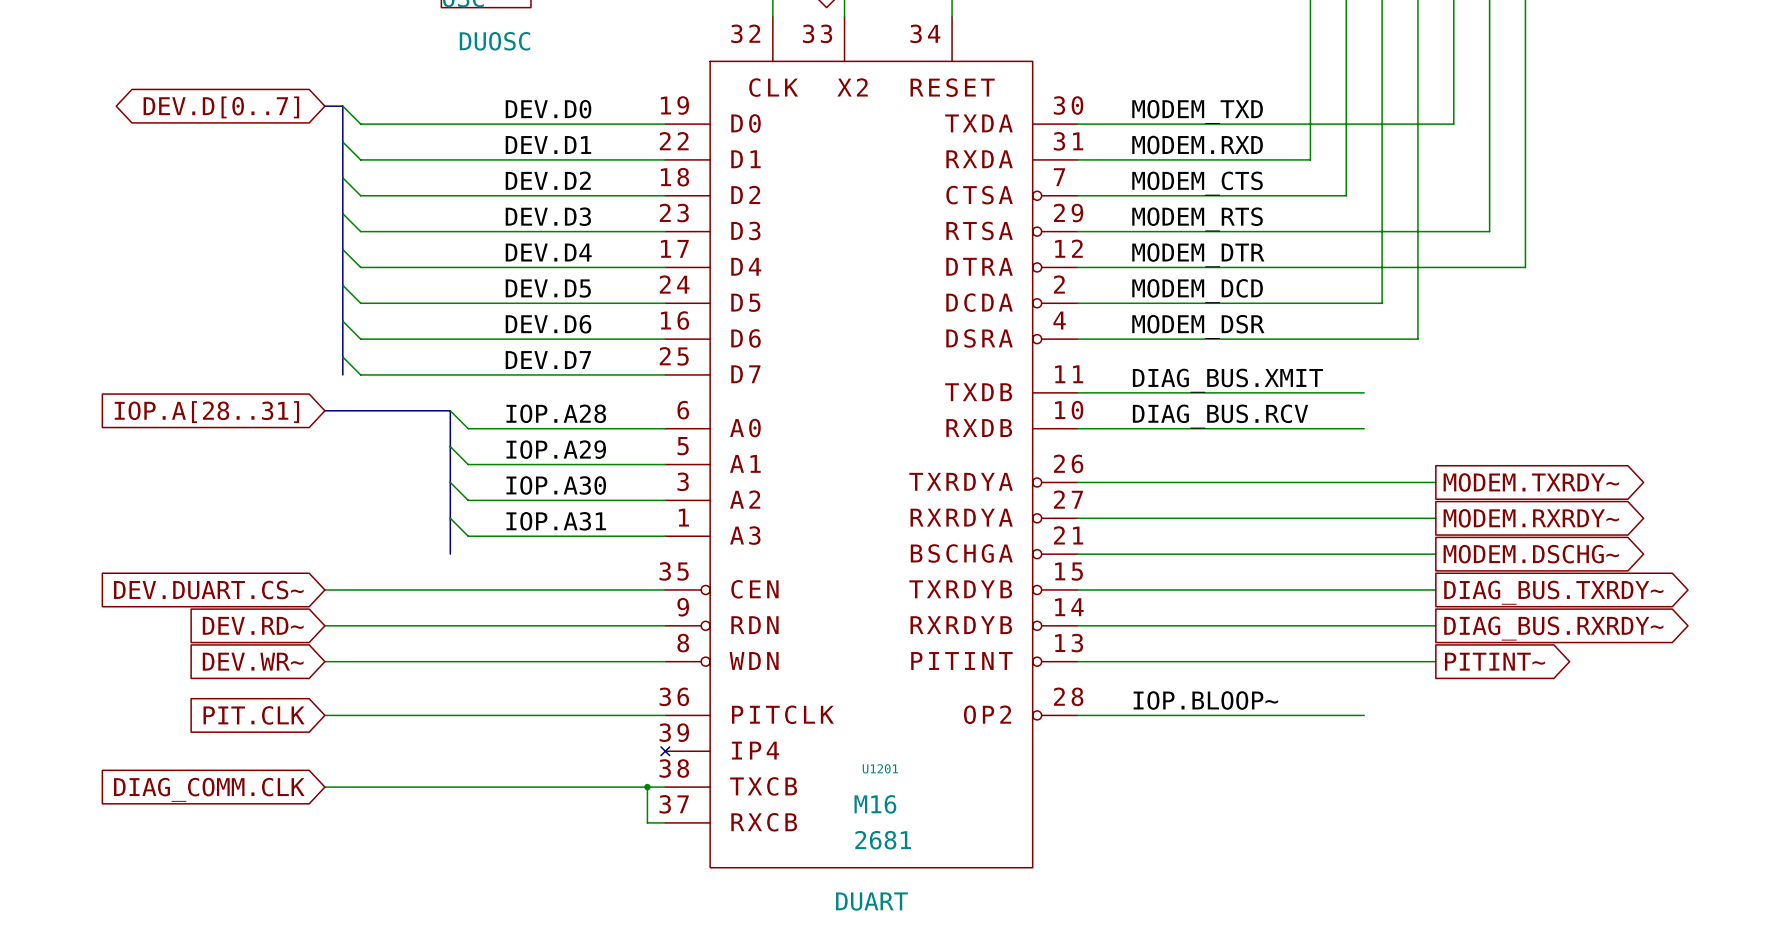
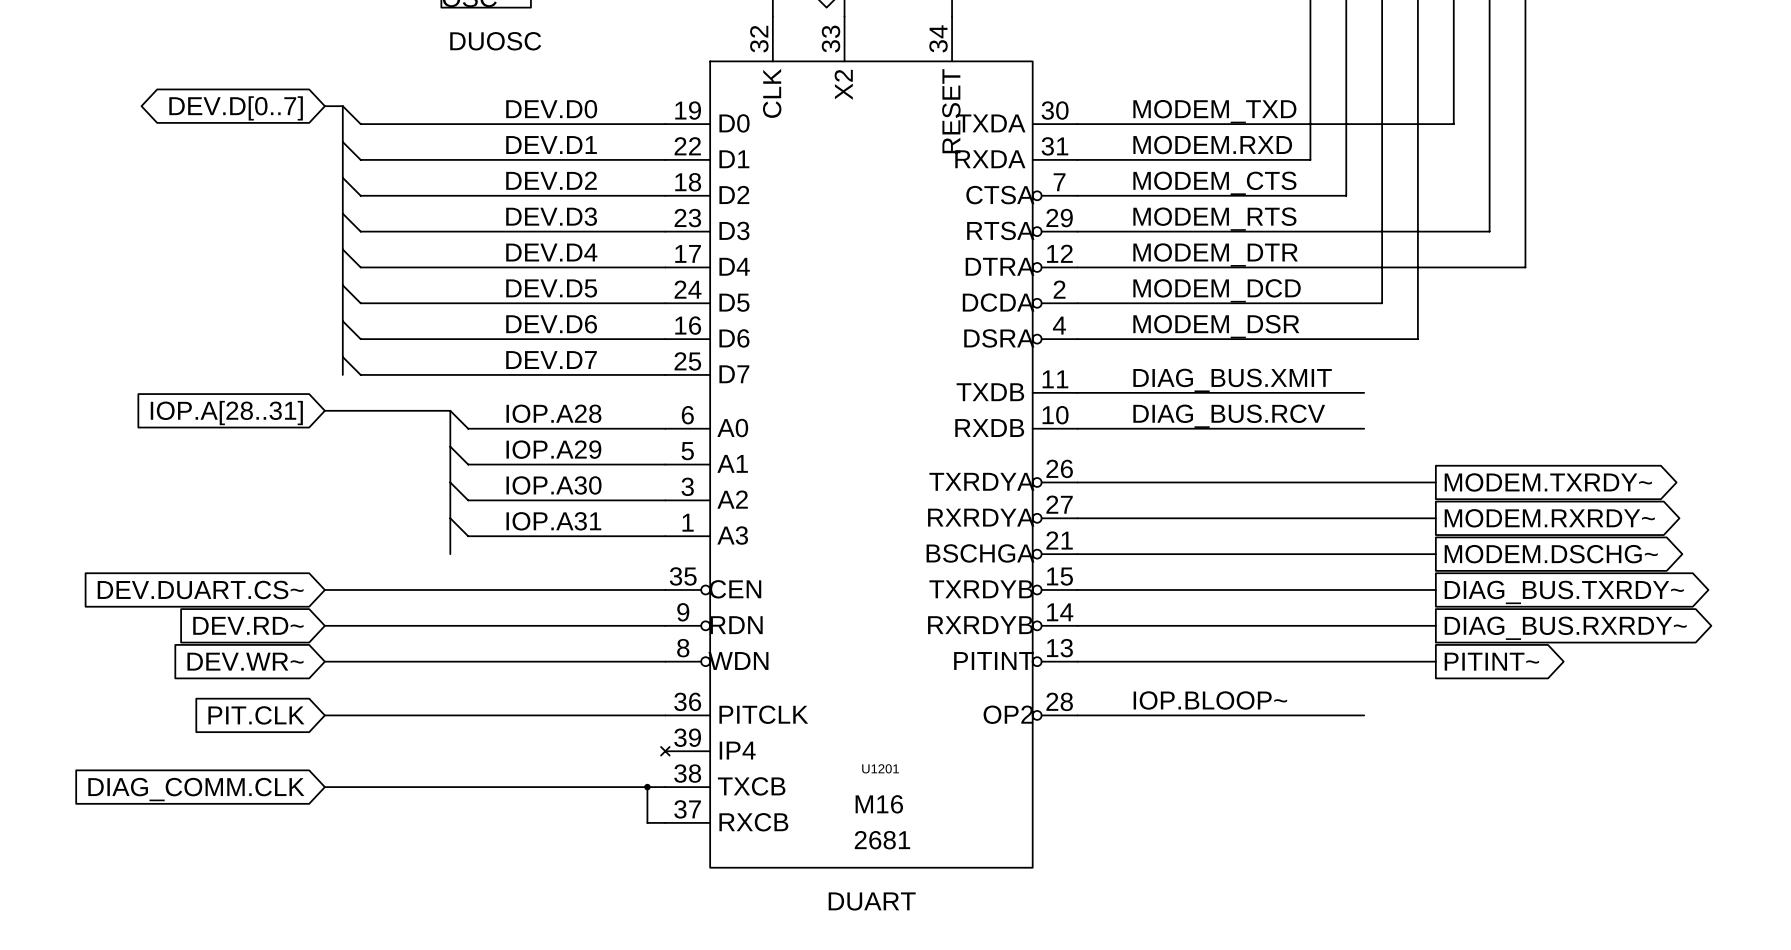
U1201 symbol: [665, 16, 1078, 868] -> [665, 16, 1078, 868]

